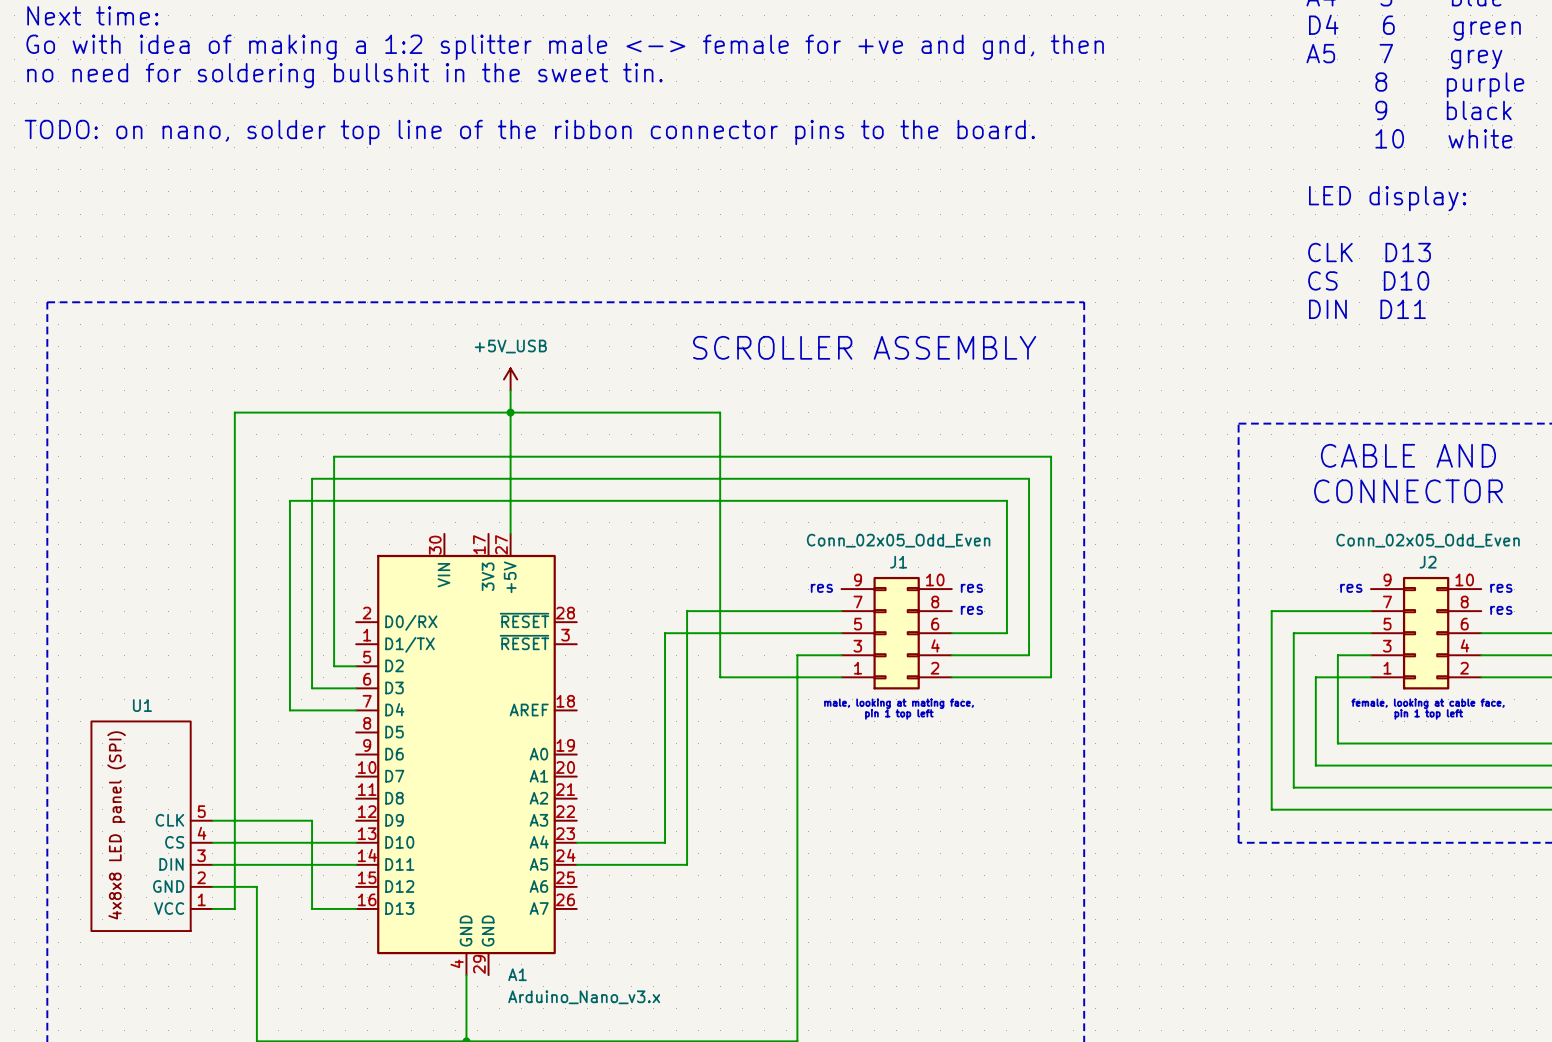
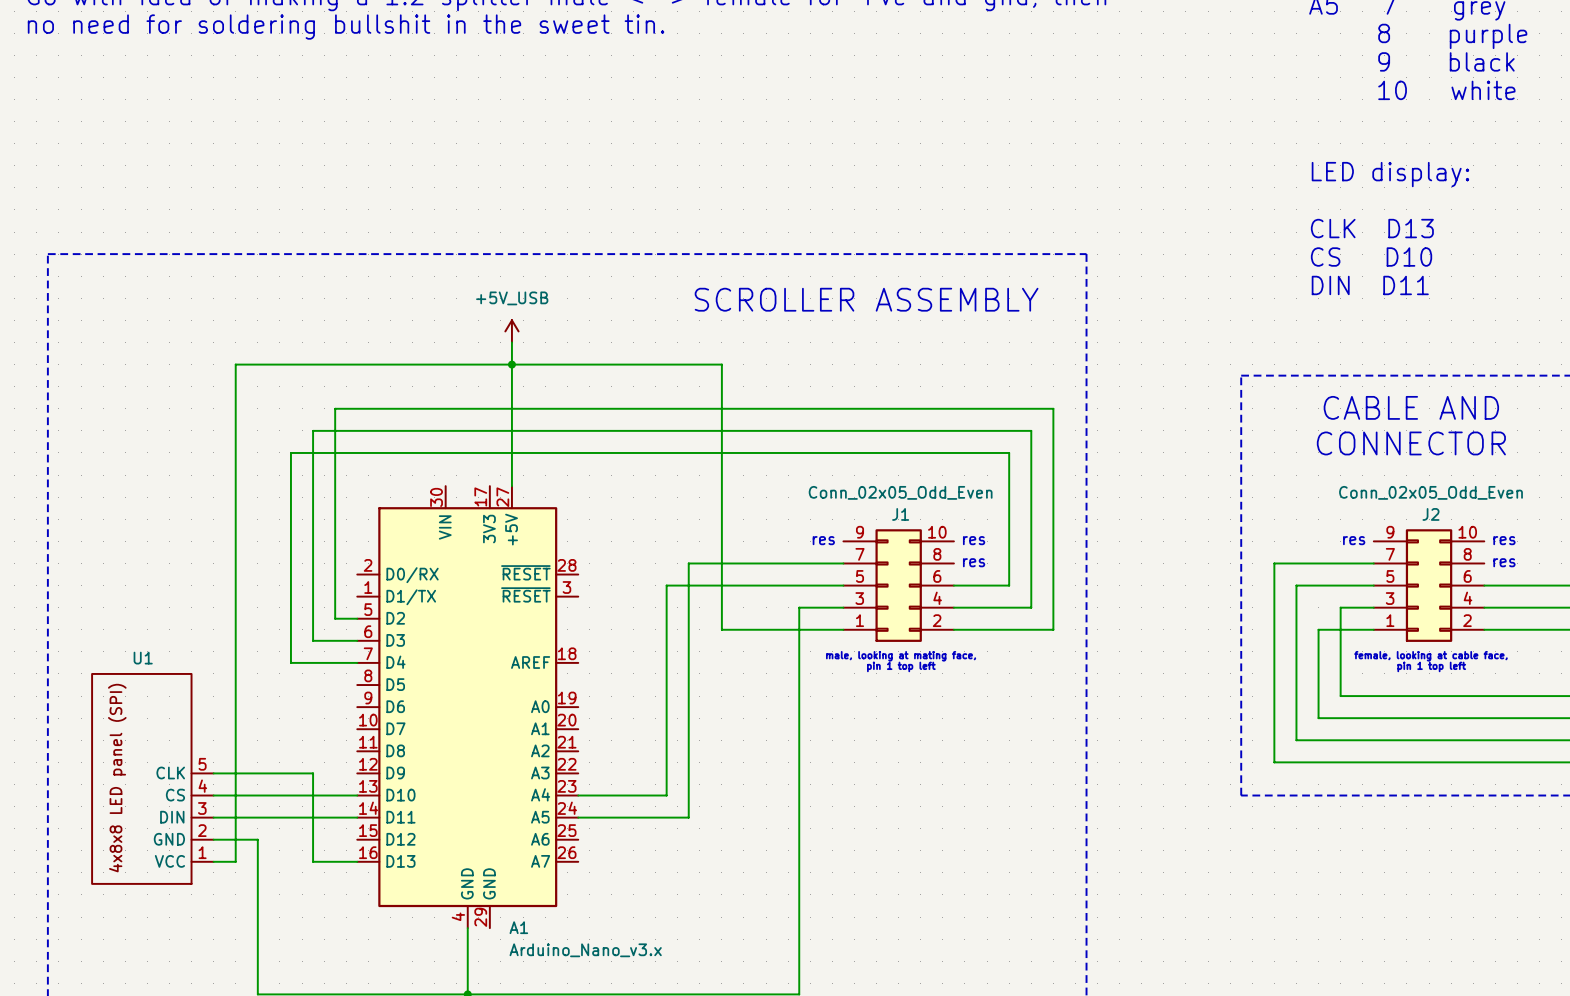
text: TODO: on nano, solder top line of the ribbon connector pins to the board. (529, 132) -> none
text position: LED display: (1387, 198) -> LED display: (1390, 174)
text position: CLK D13 (1369, 252) -> CLK D13 (1372, 228)
text position: CS D10 (1368, 280) -> CS D10 (1371, 257)
text position: DIN D11 (1367, 309) -> DIN D11 (1370, 285)

